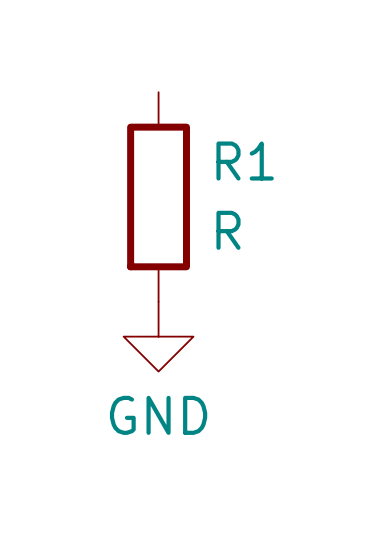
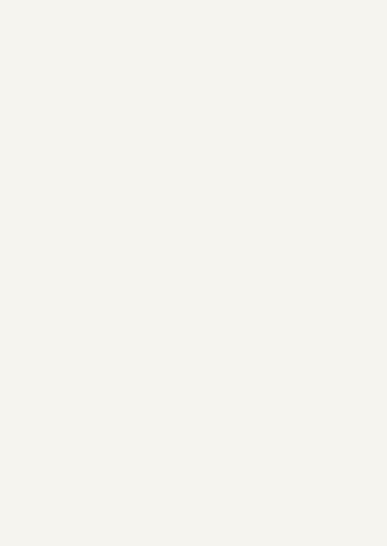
R1: R (158, 196) -> none
power symbol: GND (158, 336) -> none

